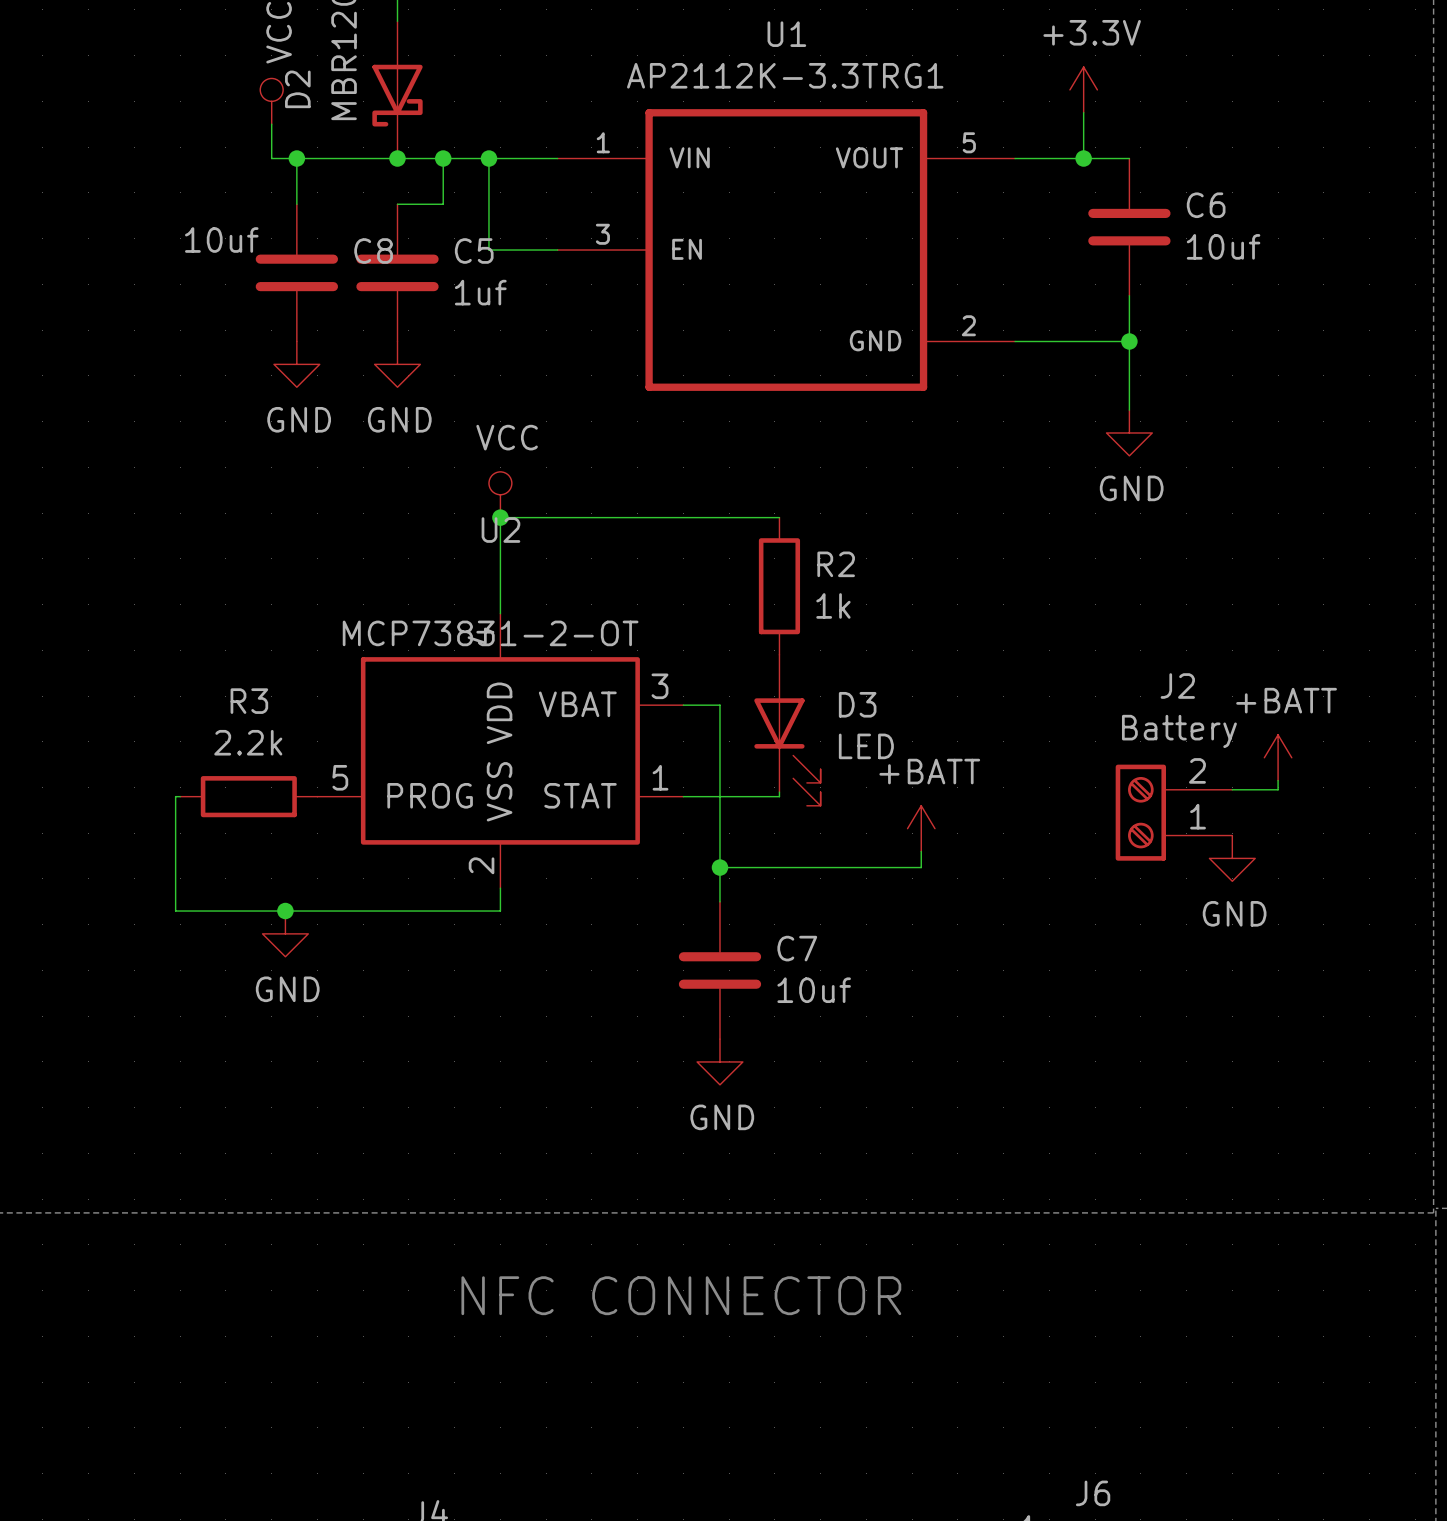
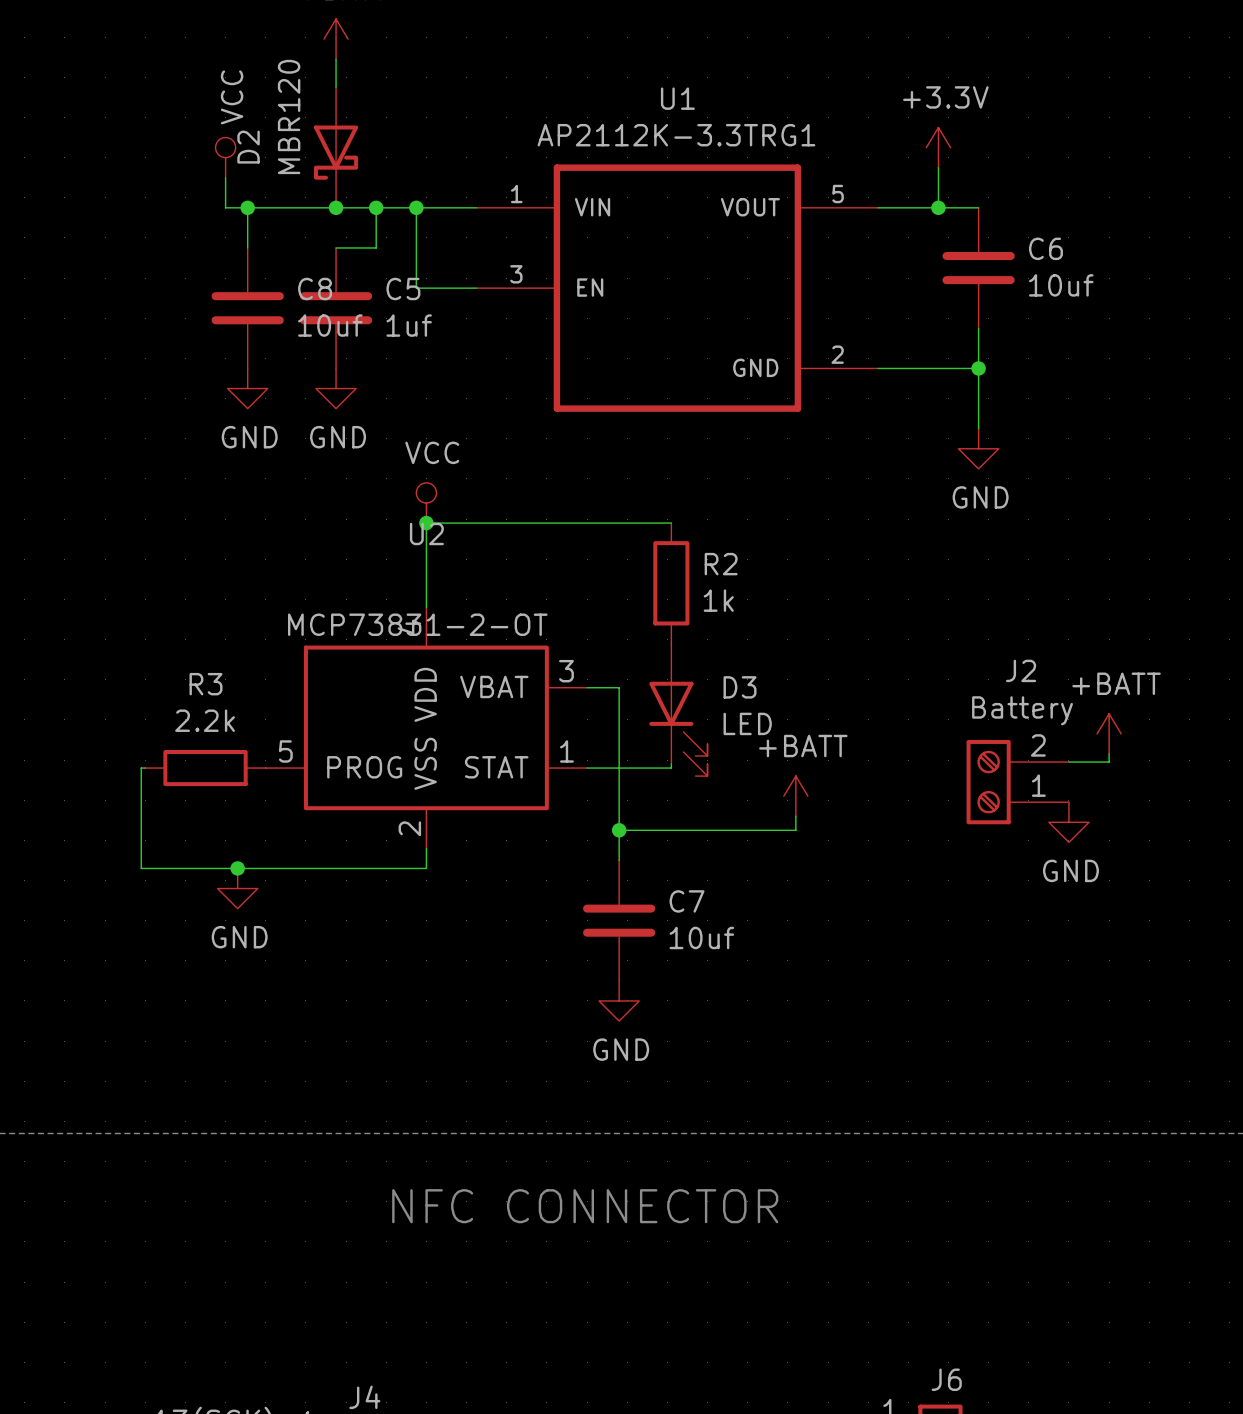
C8 value position: 10uf (221, 240) -> 10uf (330, 325)

